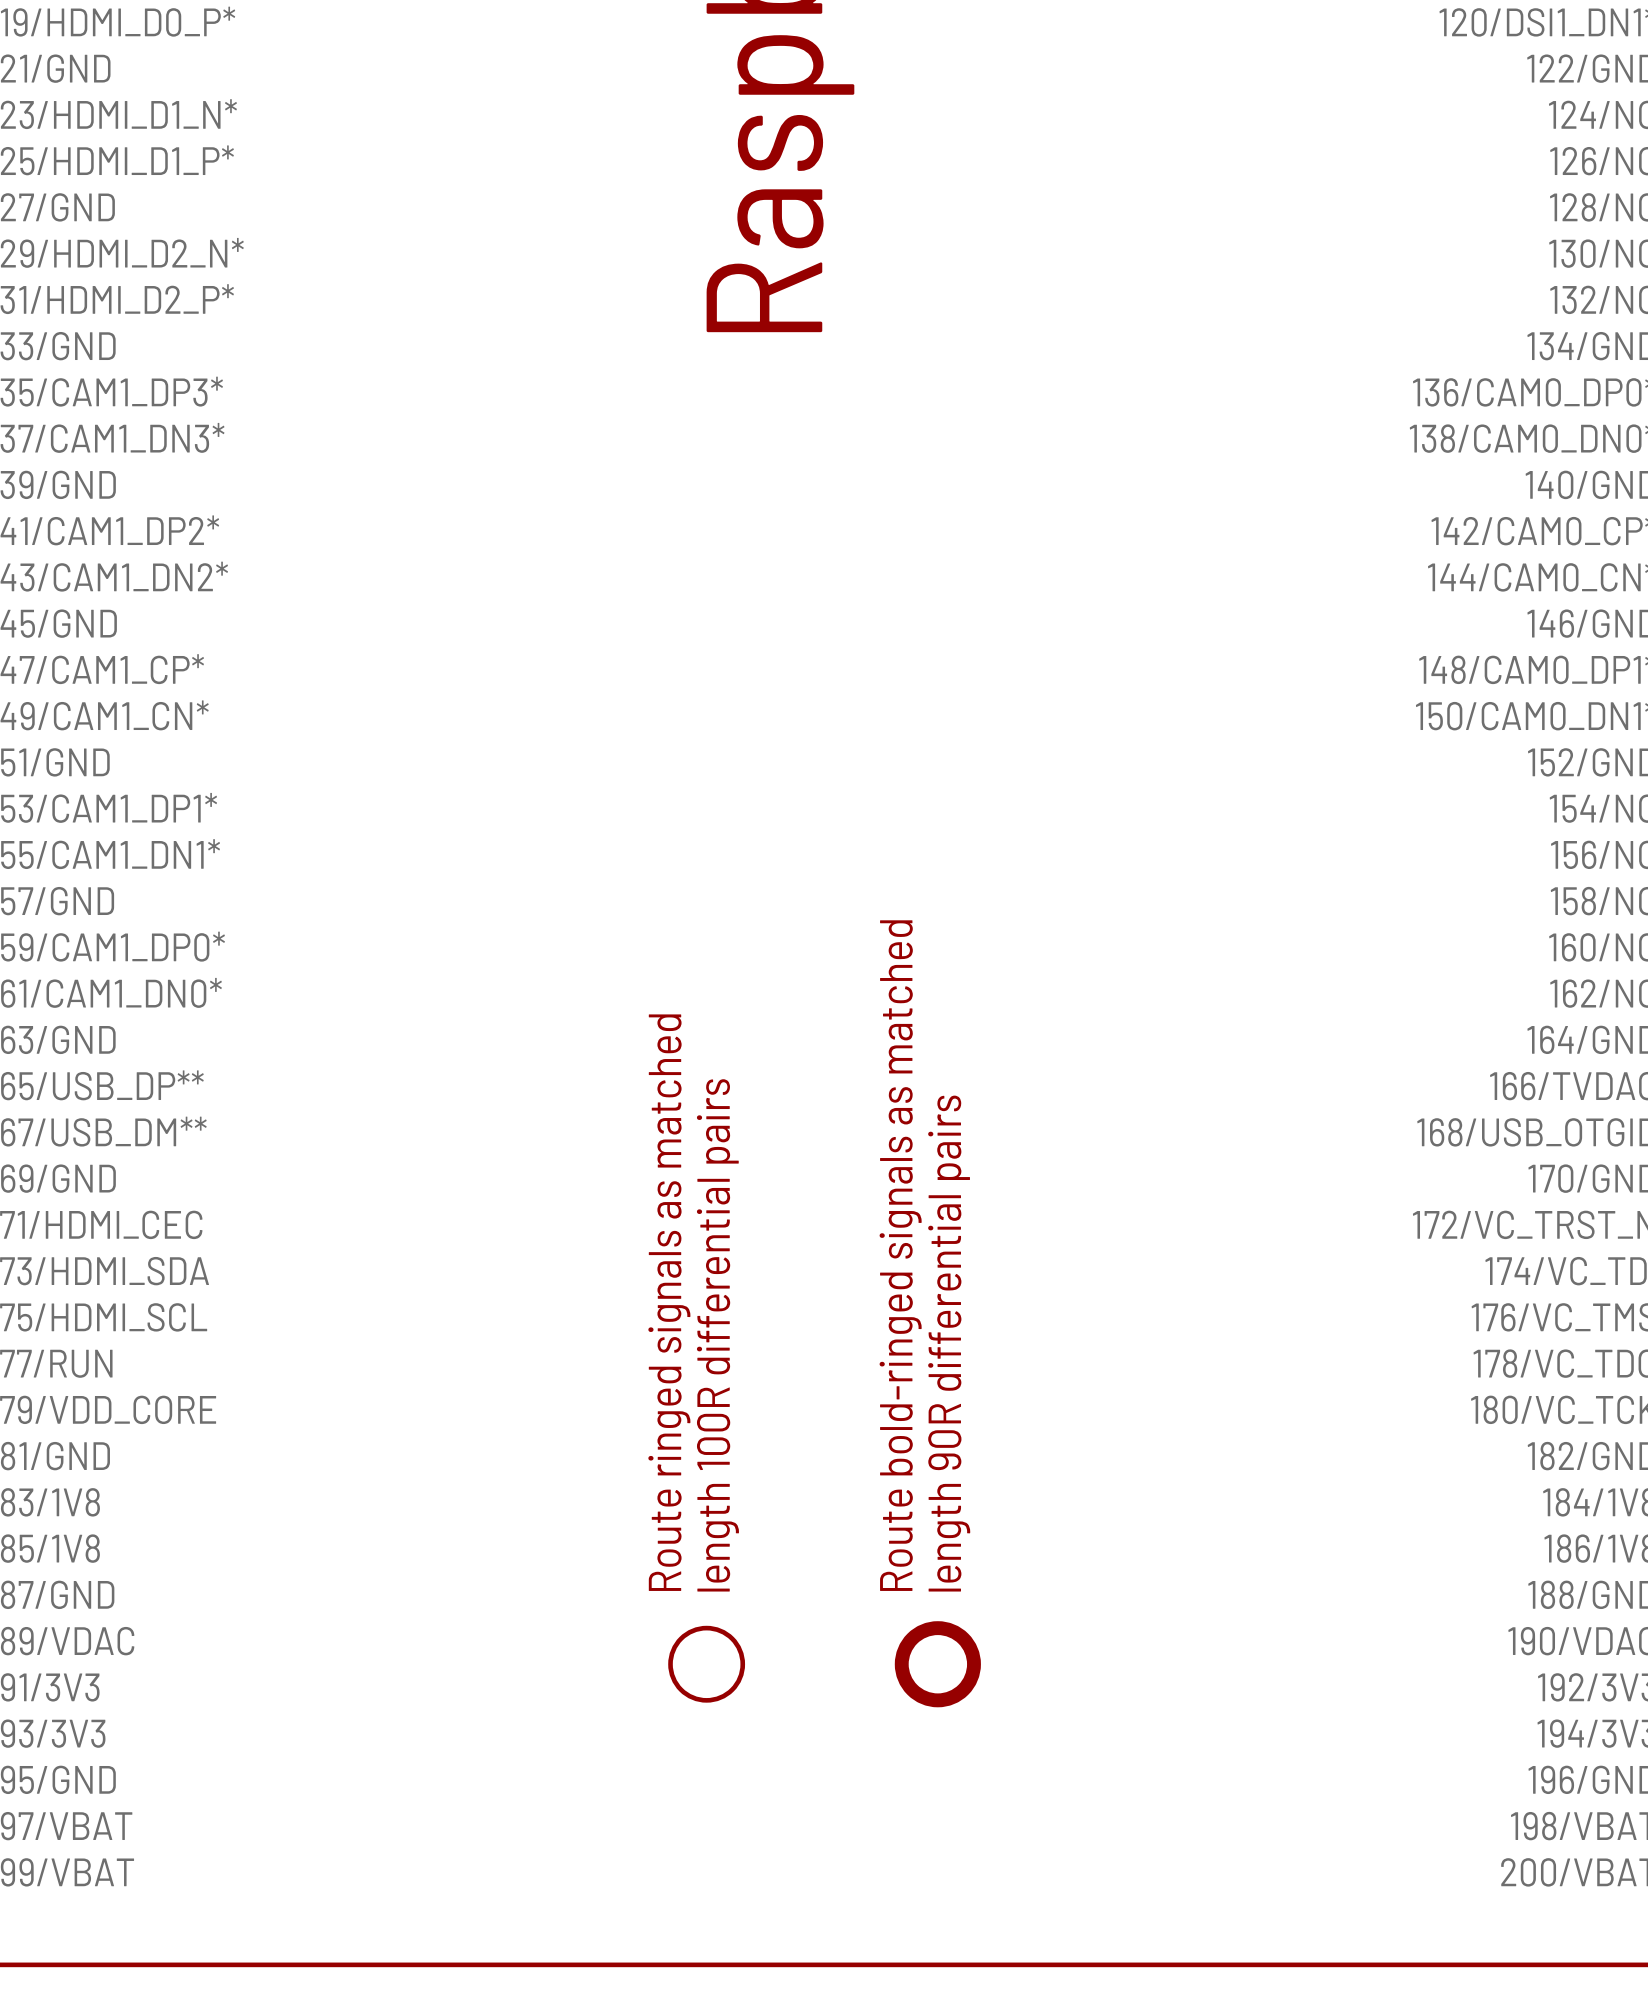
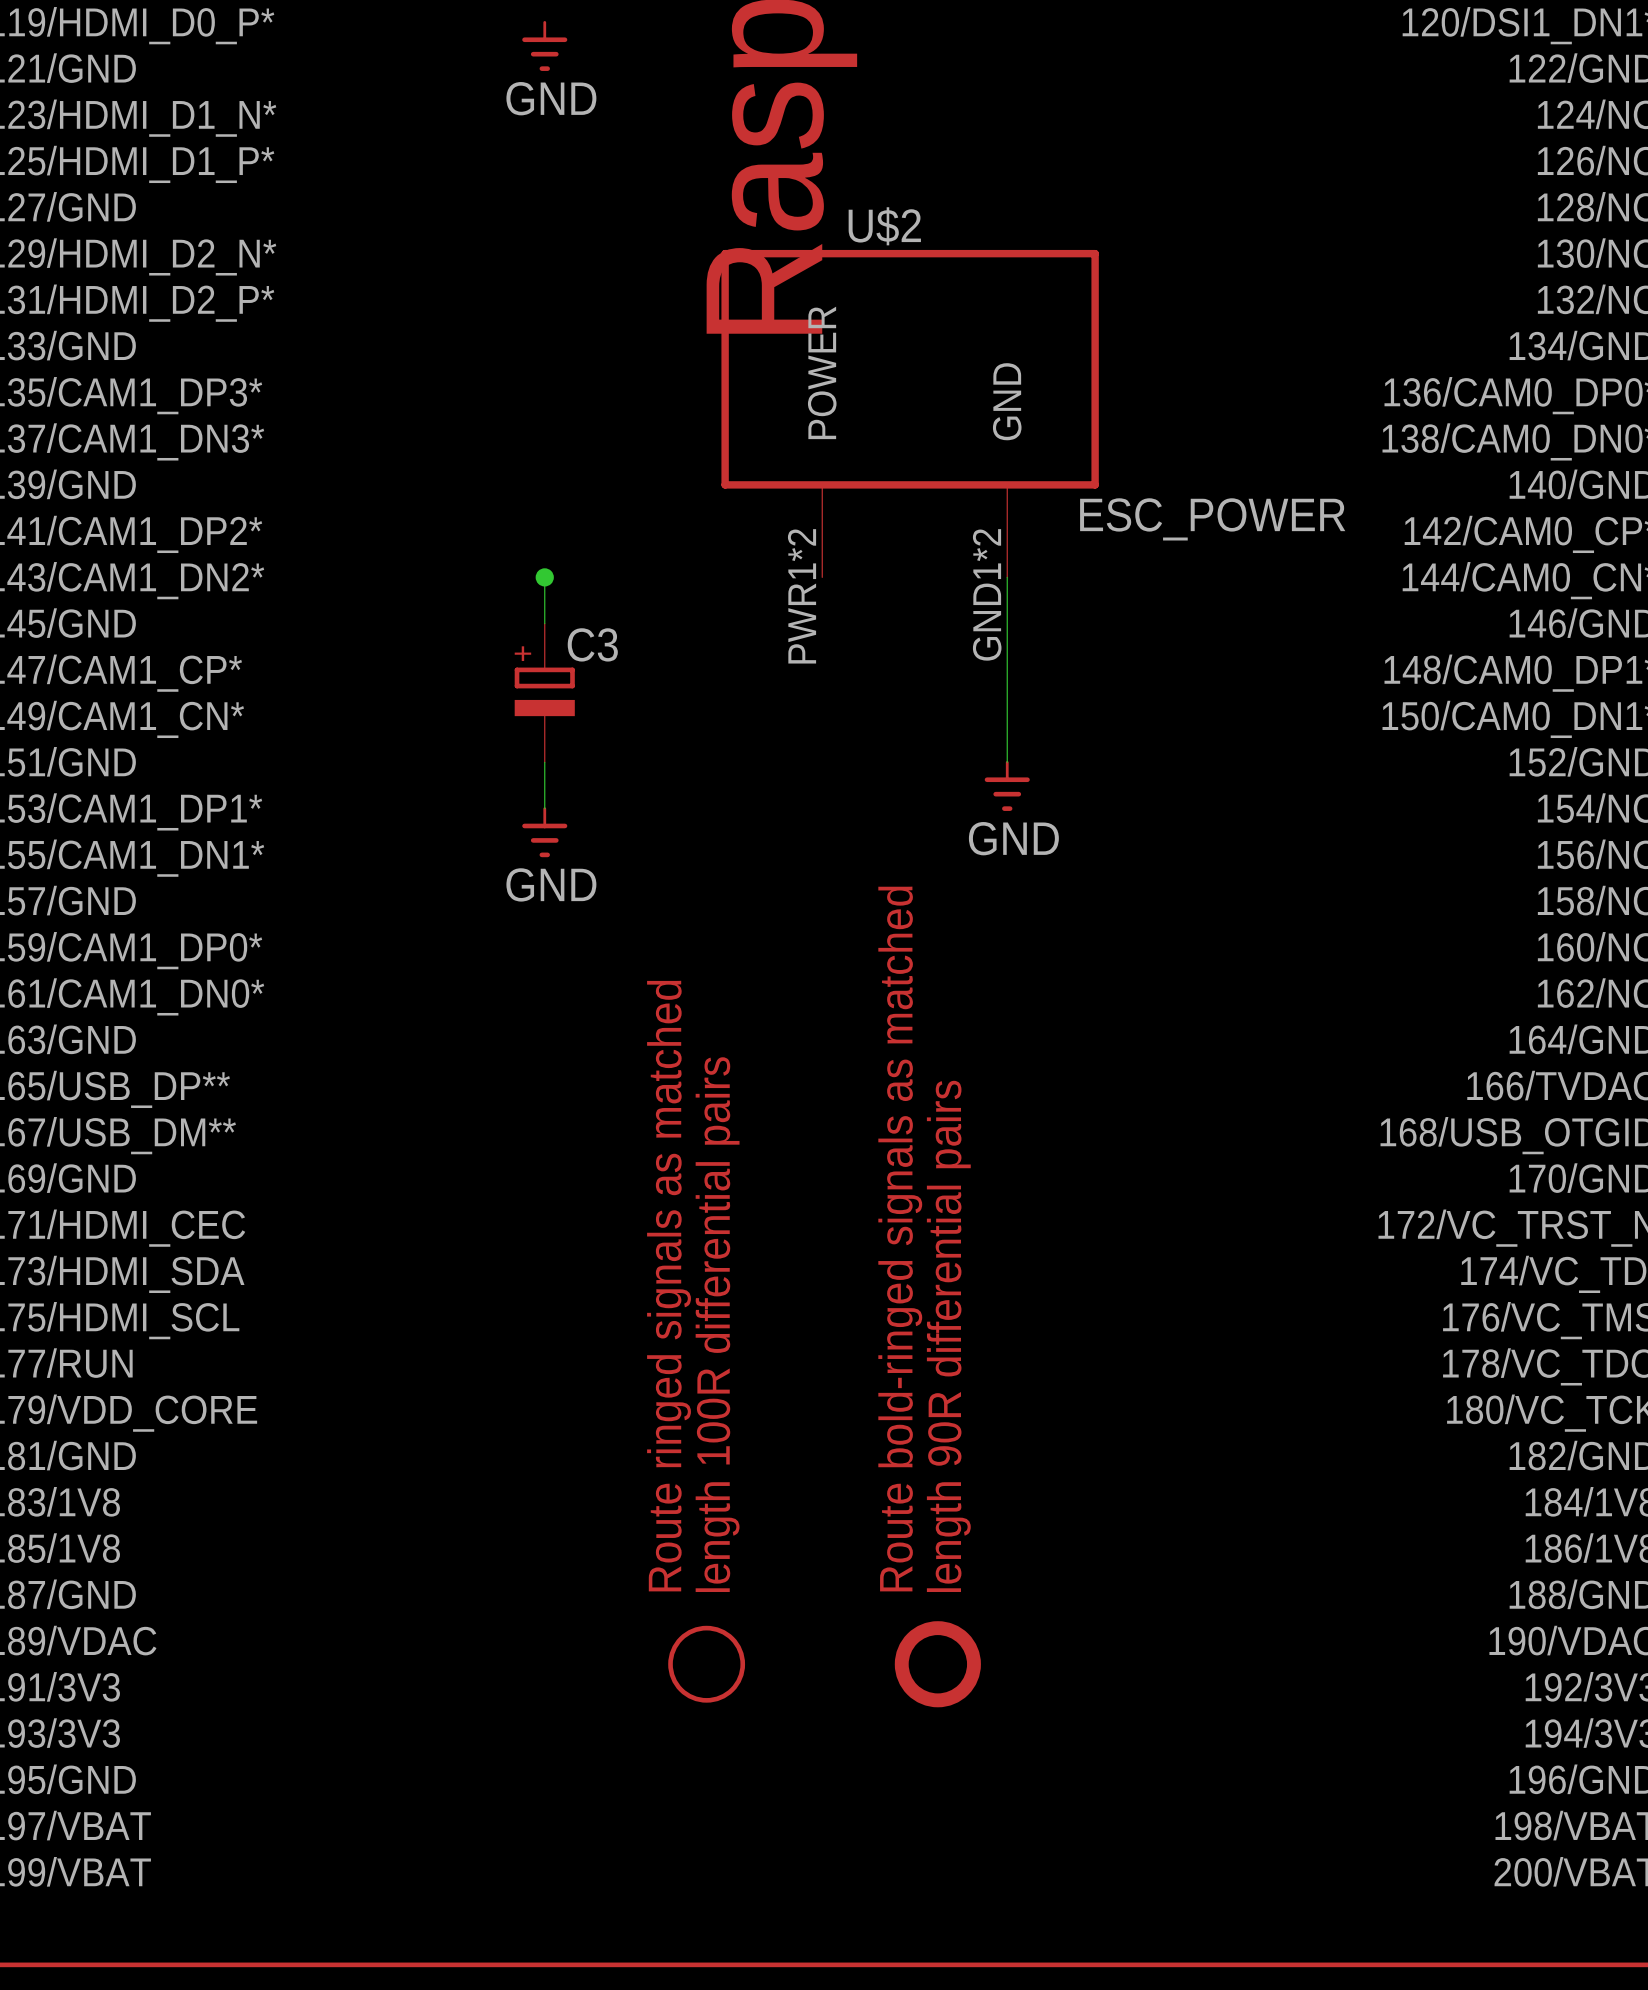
power symbol: none -> GND (544, 45)
U$2: none -> ESC_POWER (910, 413)
wire: none -> (544, 577) (544, 623)
junction: none -> (544, 577)
wire: none -> (1007, 577) (1007, 762)
C3: none -> (544, 693)
wire: none -> (544, 762) (544, 808)
power symbol: none -> GND (1007, 785)
power symbol: none -> GND (544, 832)

